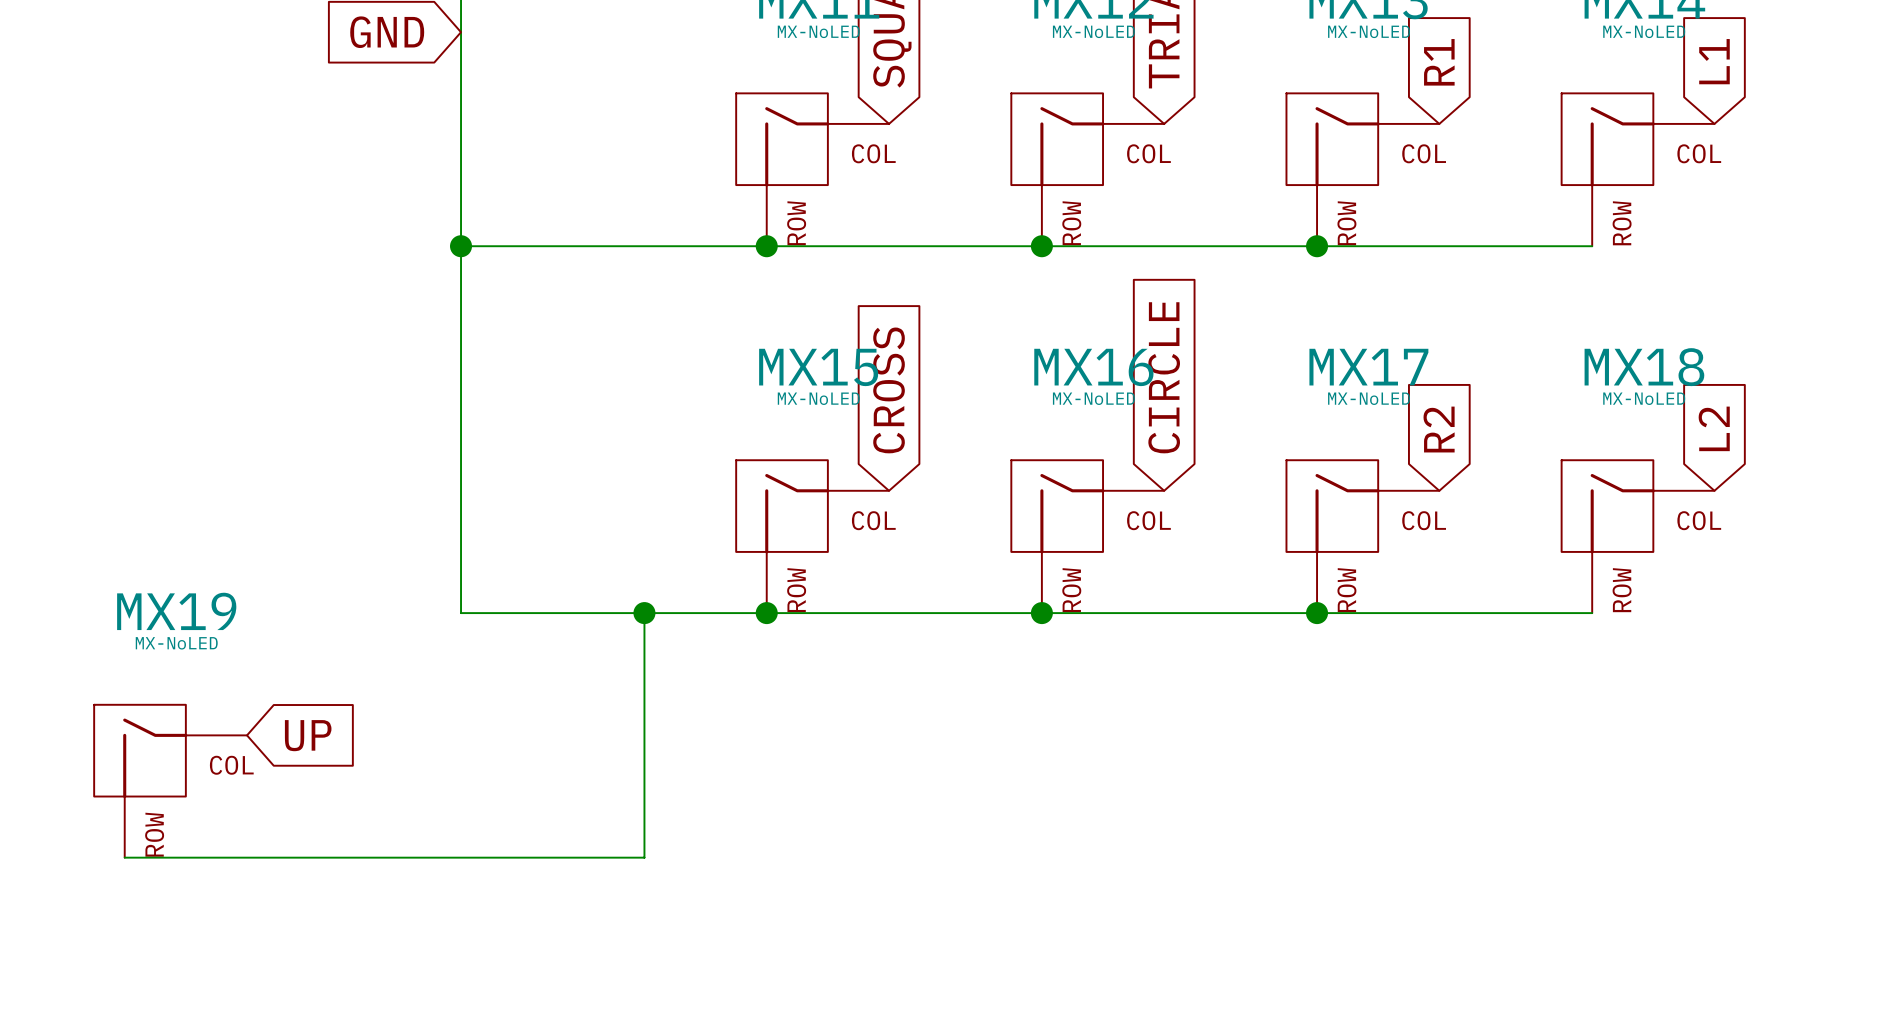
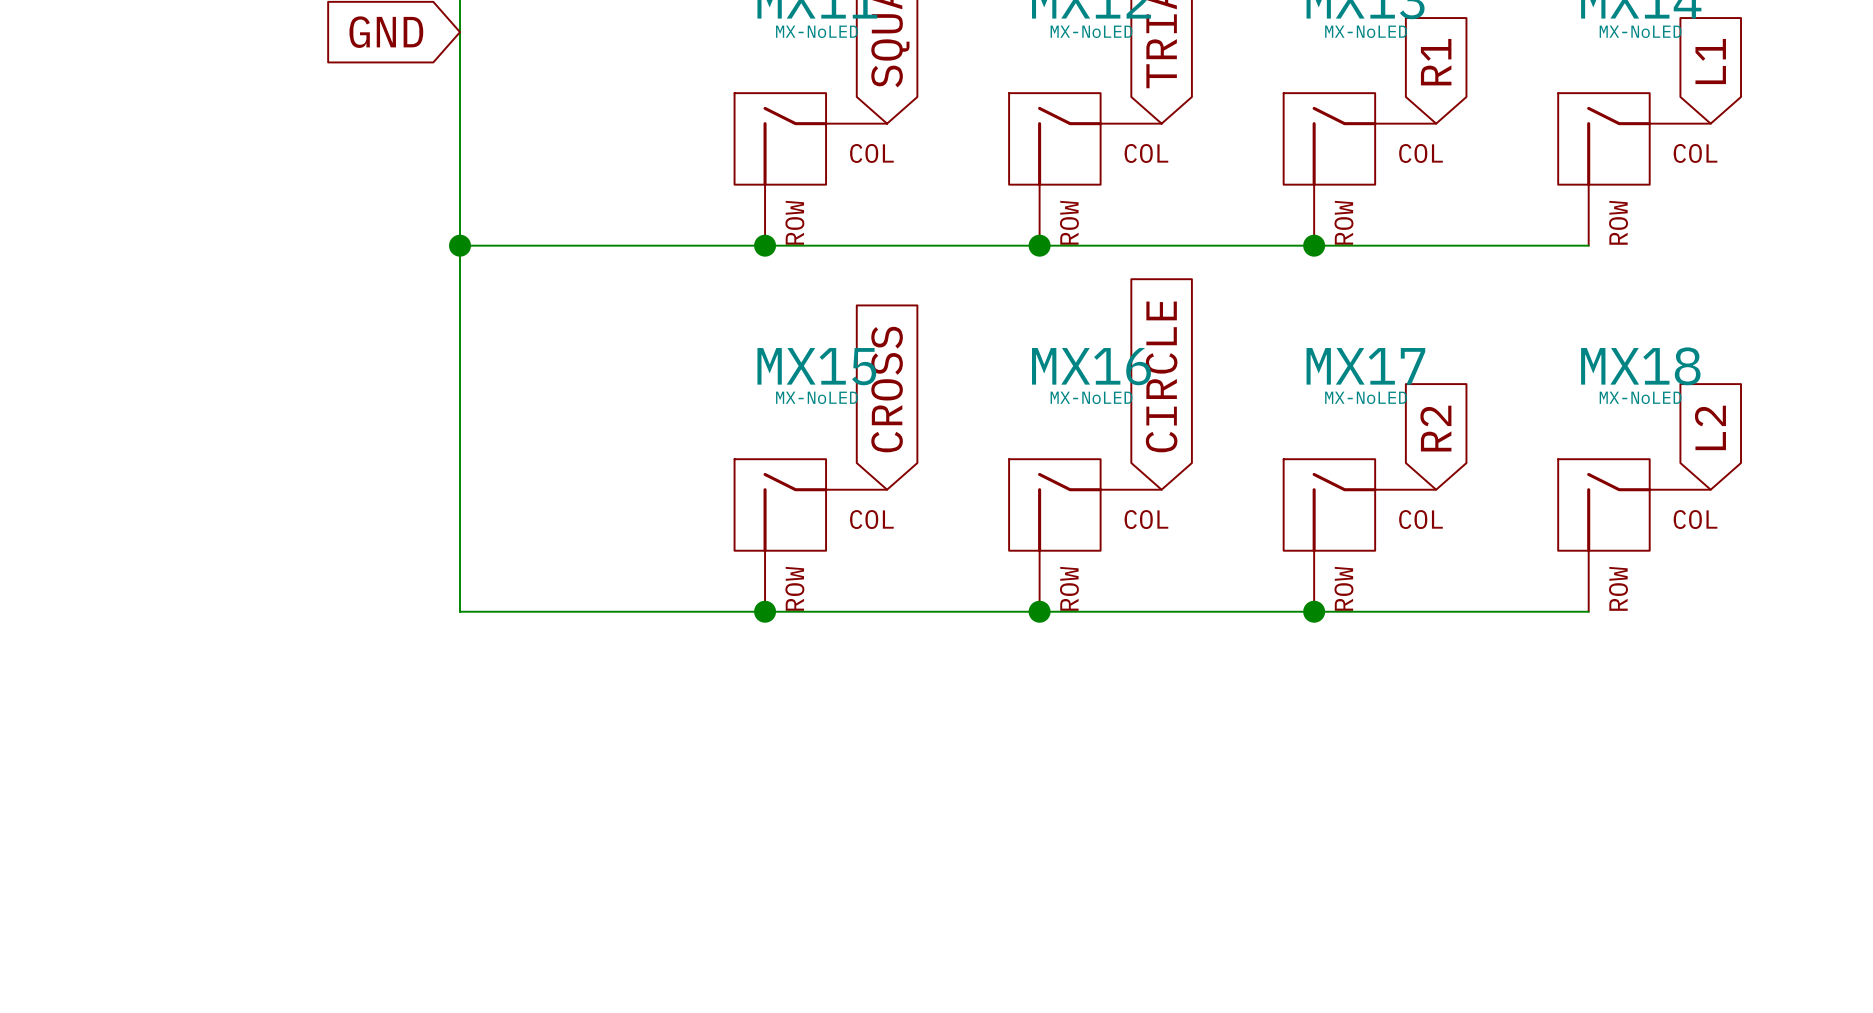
wire: (644, 613) (644, 857) (124, 857) -> none
junction: (644, 613) -> none
global label: UP (308, 735) -> none
MX19: MX-NoLED (170, 781) -> none

